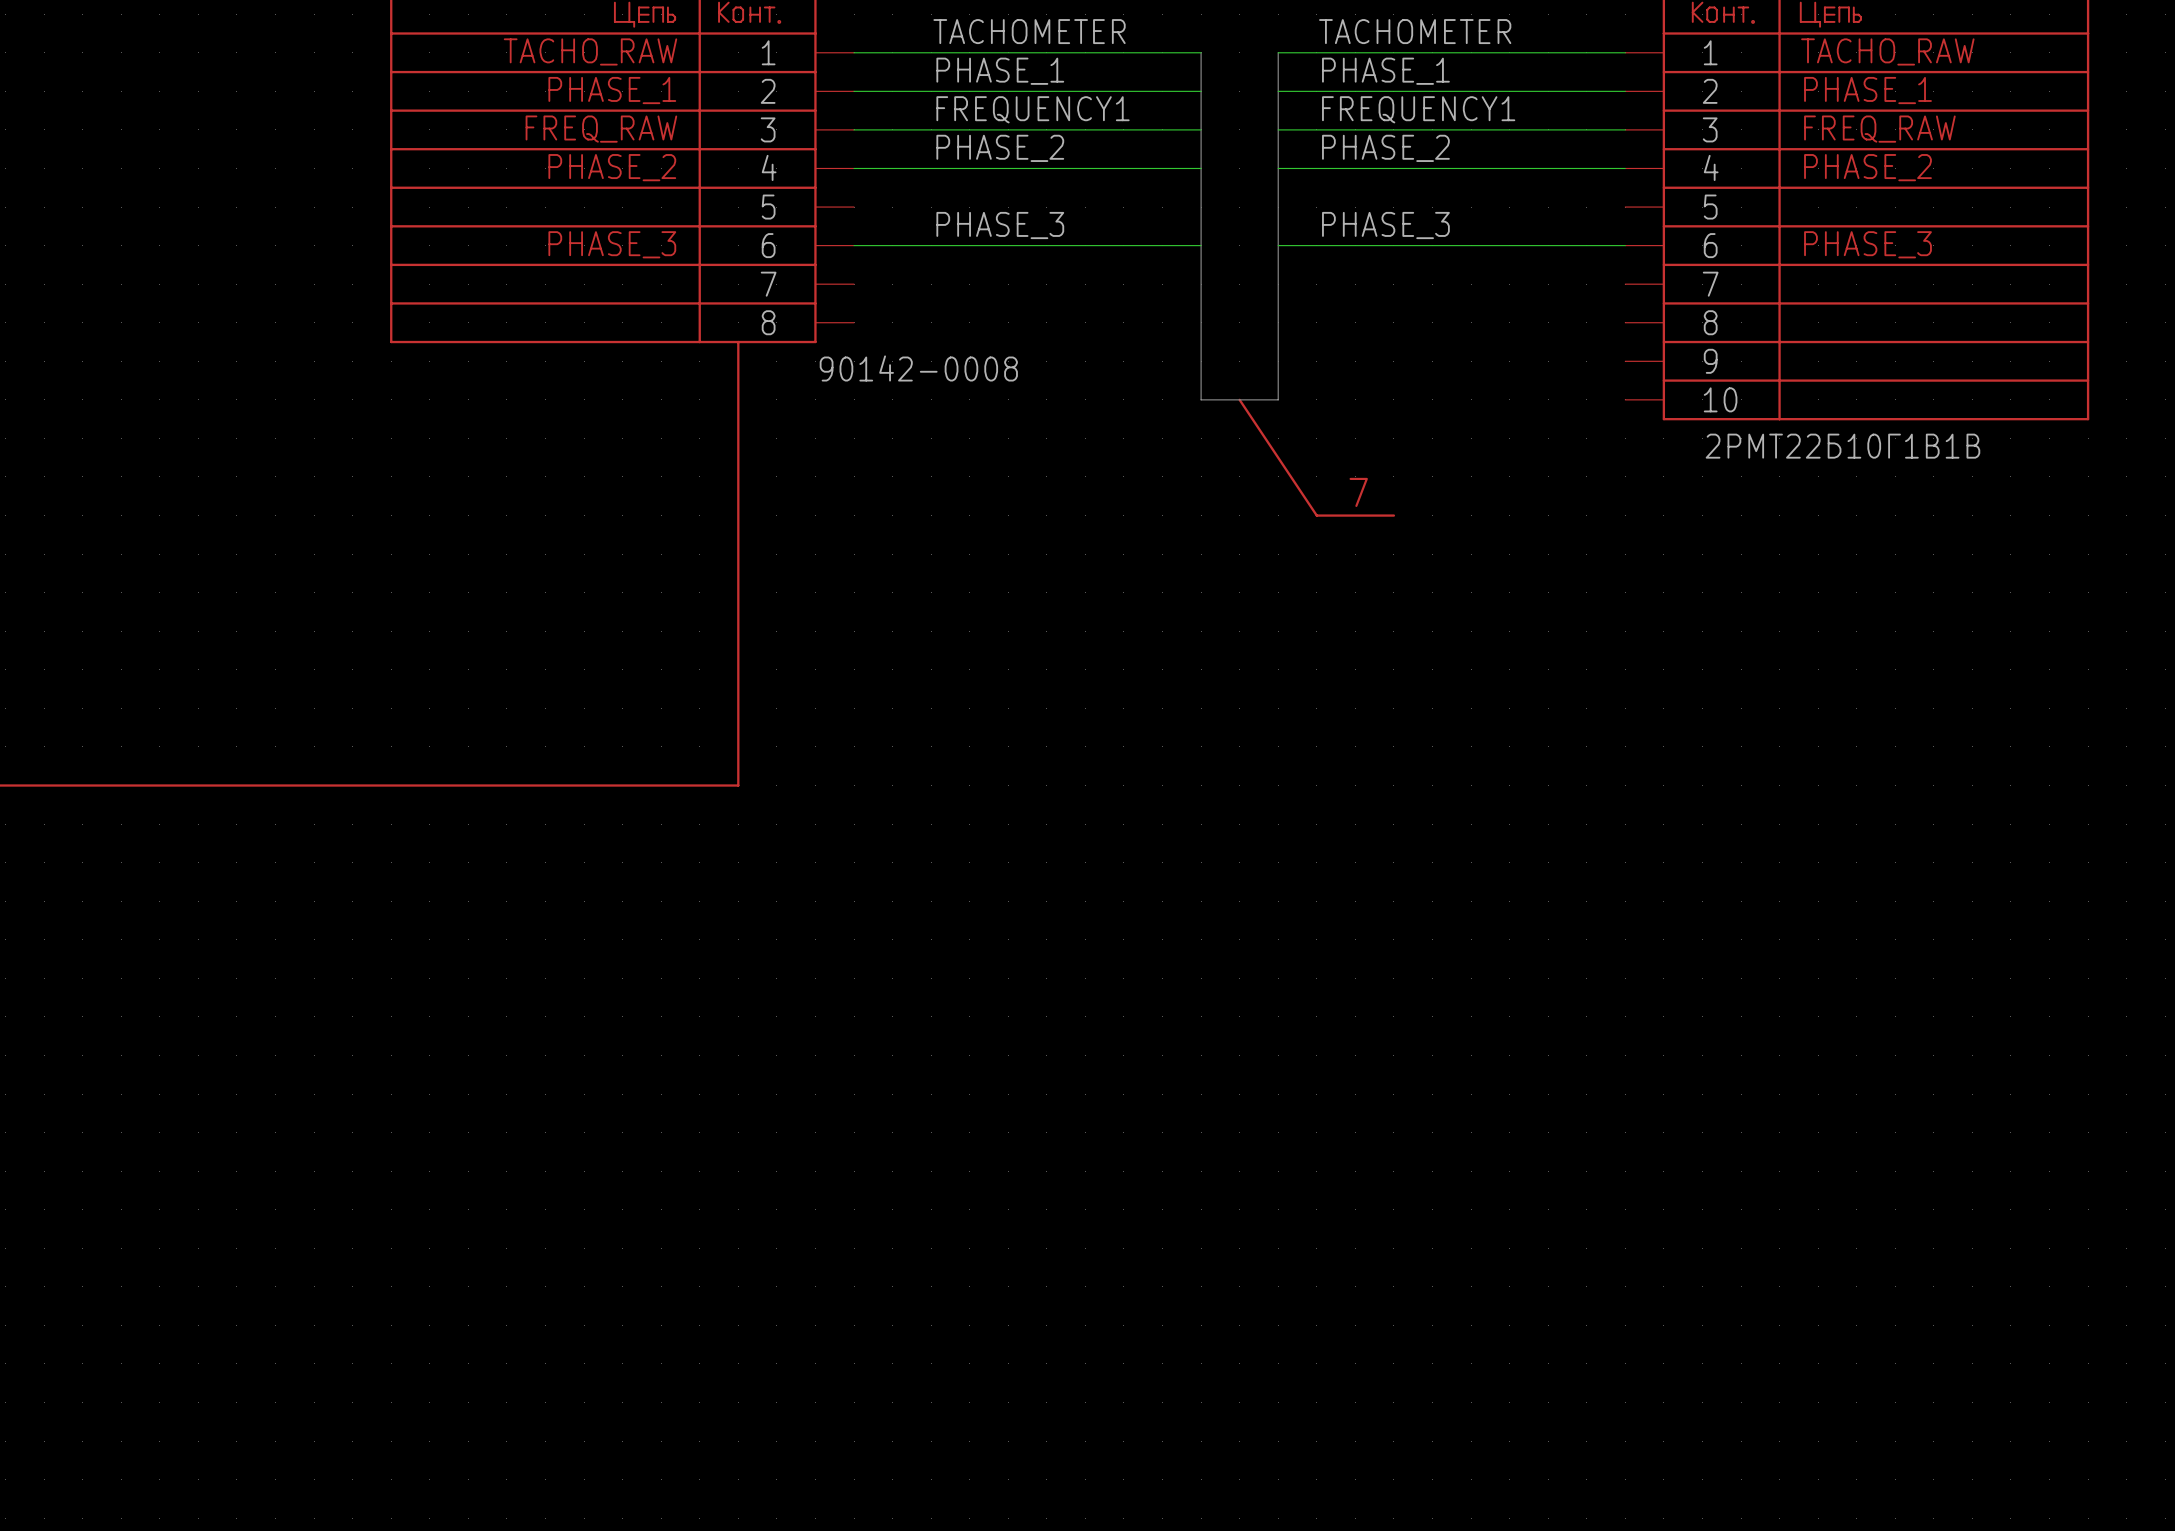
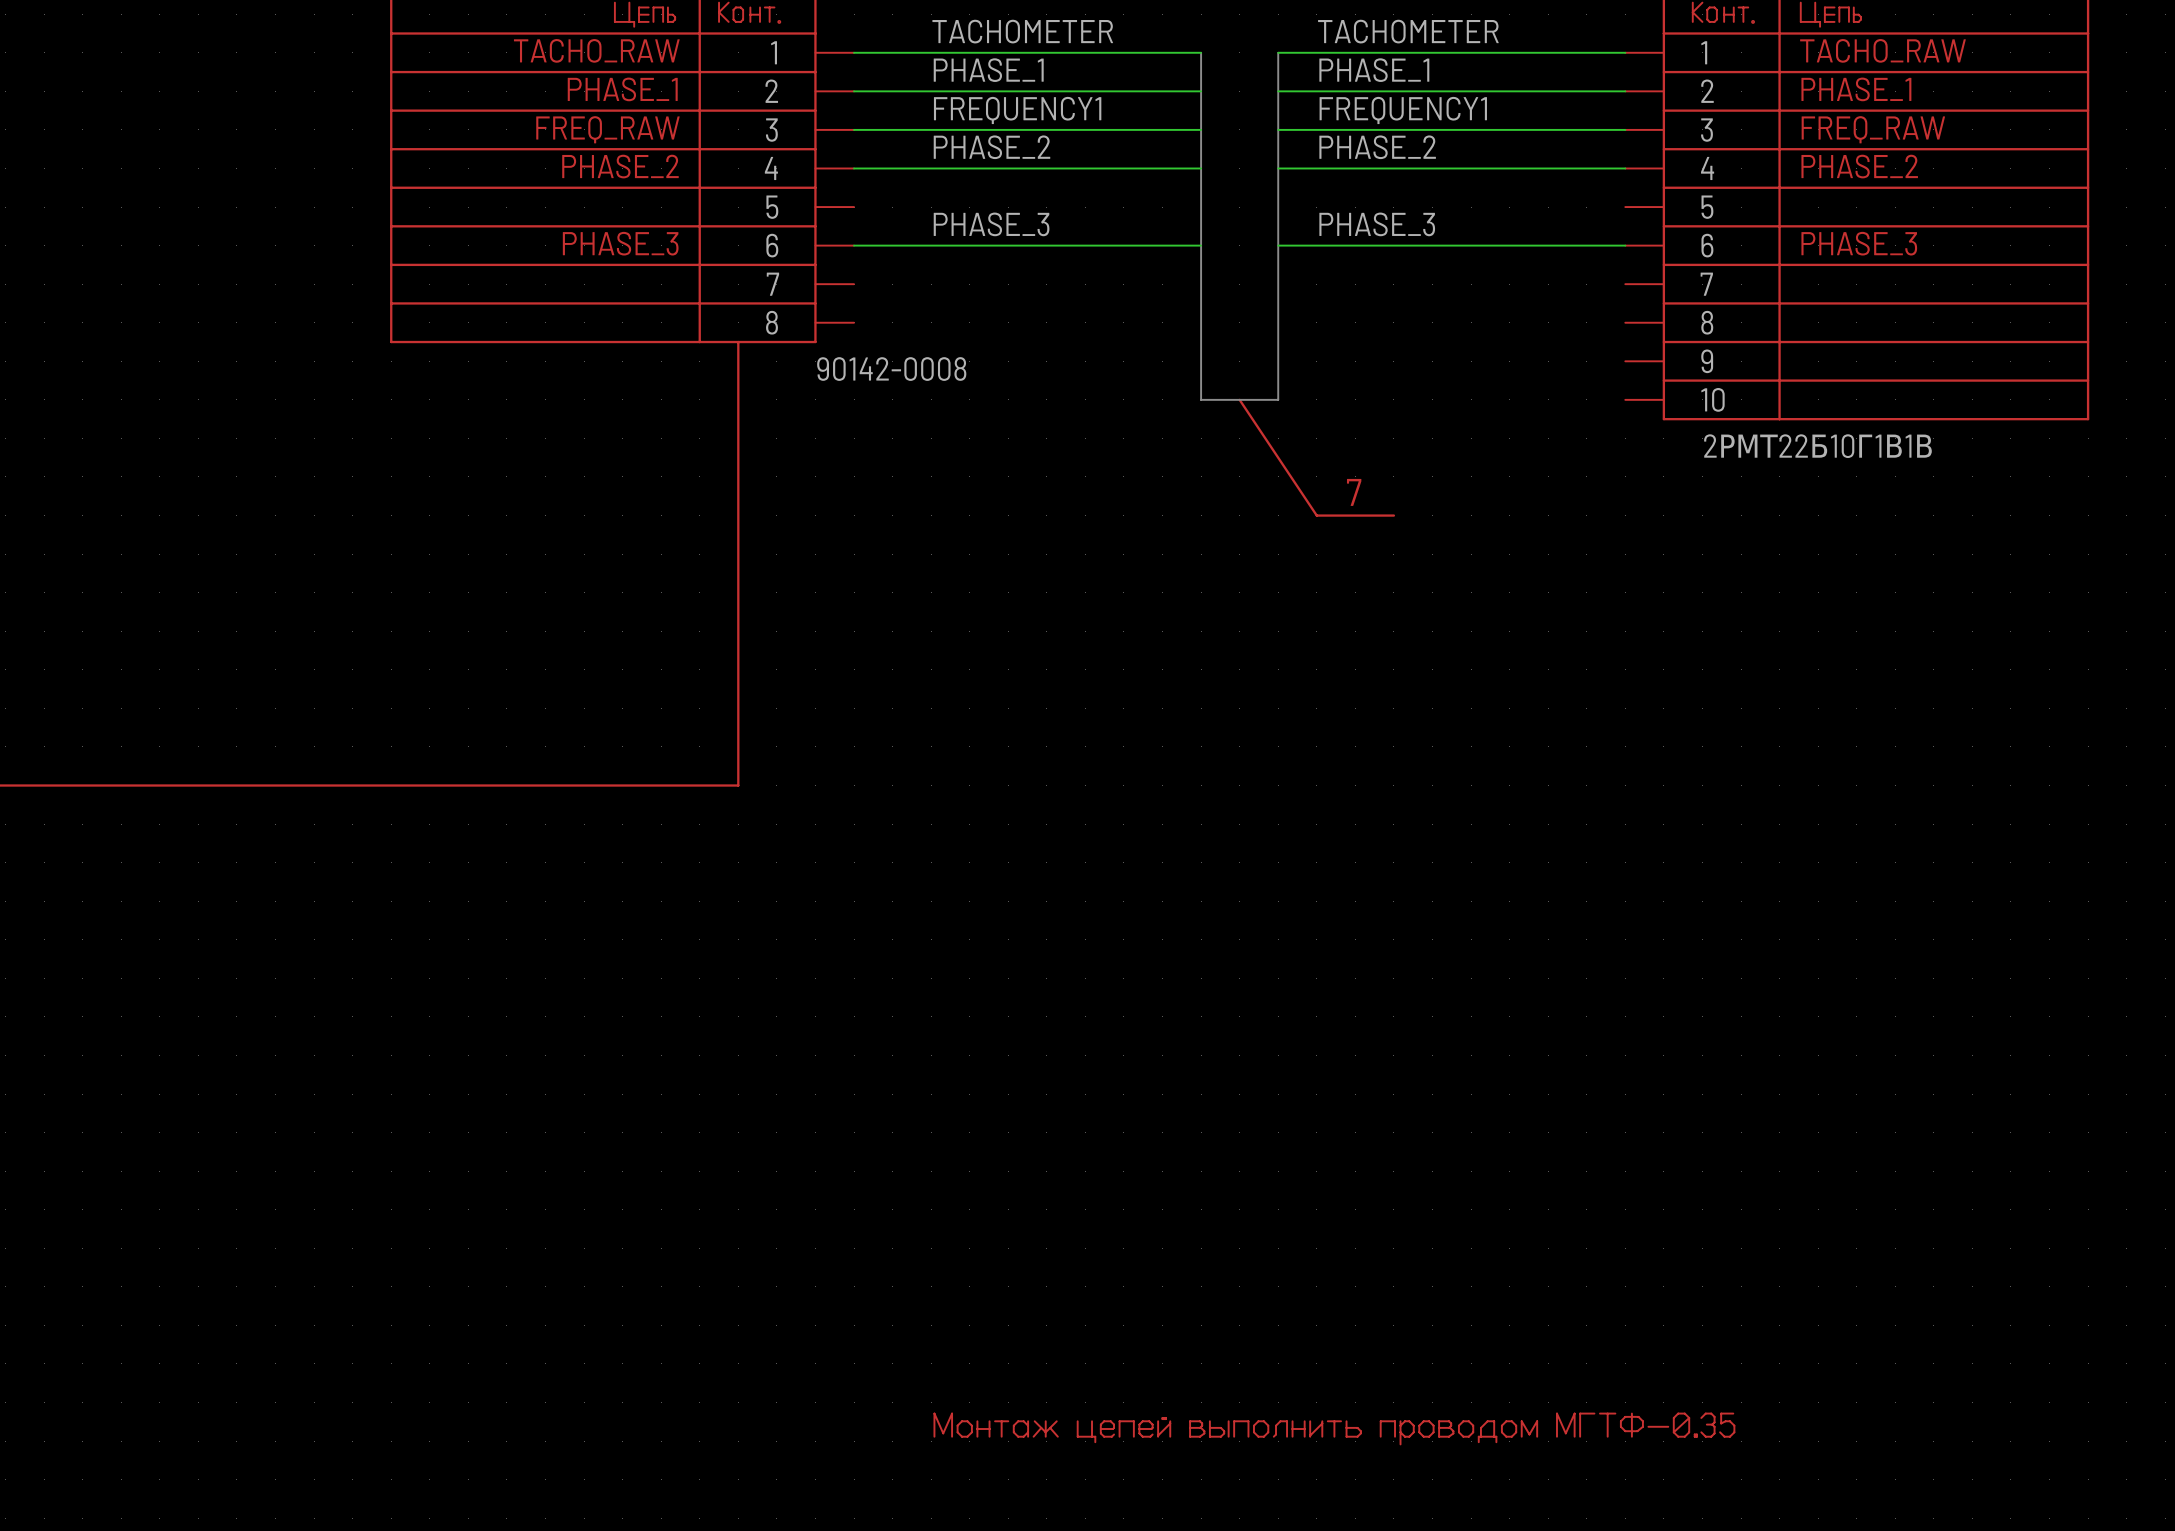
line: none -> (1594, 1413) (1580, 1413) (1580, 1436)
line: none -> (1599, 1413) (1615, 1413)
line: none -> (1607, 1413) (1607, 1436)
line: none -> (1631, 1413) (1631, 1436)
line: none -> (1733, 1413) (1721, 1413) (1721, 1423) (1729, 1421) (1734, 1425) (1734, 1432) (1729, 1436) (1724, 1436) (1720, 1432)
line: none -> (1625, 1416) (1620, 1421) (1620, 1426) (1625, 1431) (1637, 1431) (1642, 1426) (1642, 1421) (1638, 1416) (1625, 1416)
line: none -> (1162, 1417) (1162, 1419) (1165, 1419) (1165, 1417) (1162, 1417)
line: none -> (1689, 1417) (1684, 1413) (1678, 1413) (1673, 1417) (1673, 1432)
line: none -> (1689, 1417) (1689, 1432) (1684, 1436) (1678, 1436) (1673, 1432)
line: none -> (1689, 1417) (1673, 1432)
line: none -> (1701, 1417) (1705, 1413) (1711, 1413) (1714, 1416) (1714, 1422) (1712, 1424)
line: none -> (961, 1421) (967, 1421) (971, 1425) (971, 1432) (967, 1436) (961, 1436) (957, 1432) (957, 1425) (961, 1421)
line: none -> (977, 1421) (977, 1436)
line: none -> (989, 1421) (989, 1436)
line: none -> (995, 1421) (1008, 1421)
line: none -> (1001, 1421) (1001, 1436)
line: none -> (1028, 1421) (1028, 1436)
line: none -> (1034, 1421) (1045, 1432) (1056, 1421)
line: none -> (1045, 1421) (1045, 1436)
line: none -> (1077, 1421) (1077, 1436) (1095, 1436) (1095, 1442)
line: none -> (1092, 1421) (1092, 1436)
line: none -> (1158, 1421) (1158, 1436)
line: none -> (1170, 1421) (1170, 1436)
line: none -> (1209, 1421) (1209, 1436) (1220, 1436) (1224, 1433) (1220, 1427) (1209, 1427)
line: none -> (1228, 1421) (1228, 1436)
line: none -> (1258, 1421) (1263, 1421) (1268, 1425) (1268, 1432) (1263, 1436) (1258, 1436) (1253, 1432) (1253, 1425) (1258, 1421)
line: none -> (1292, 1421) (1292, 1436)
line: none -> (1304, 1421) (1304, 1436)
line: none -> (1310, 1421) (1310, 1436)
line: none -> (1322, 1421) (1322, 1436)
line: none -> (1327, 1421) (1341, 1421)
line: none -> (1334, 1421) (1334, 1436)
line: none -> (1346, 1421) (1346, 1436) (1357, 1436) (1360, 1433) (1357, 1427) (1346, 1427)
line: none -> (1400, 1421) (1400, 1444)
line: none -> (1423, 1421) (1429, 1421) (1433, 1425) (1433, 1432) (1429, 1436) (1423, 1436) (1419, 1432) (1419, 1425) (1423, 1421)
line: none -> (1463, 1421) (1468, 1421) (1473, 1425) (1473, 1432) (1468, 1436) (1463, 1436) (1458, 1432) (1458, 1425) (1463, 1421)
line: none -> (1506, 1421) (1511, 1421) (1516, 1425) (1516, 1432) (1511, 1436) (1506, 1436) (1501, 1432) (1501, 1425) (1506, 1421)
line: none -> (1170, 1423) (1158, 1435)
line: none -> (1322, 1423) (1310, 1435)
line: none -> (1706, 1424) (1712, 1424)
line: none -> (1712, 1424) (1714, 1426) (1714, 1433) (1711, 1436) (1705, 1436) (1701, 1432)
line: none -> (1028, 1425) (1023, 1421) (1018, 1421) (1013, 1425) (1013, 1432) (1018, 1436) (1023, 1436) (1028, 1432)
line: none -> (1400, 1425) (1404, 1421) (1409, 1421) (1413, 1425) (1413, 1432) (1409, 1436) (1404, 1436) (1400, 1432)
line: none -> (1648, 1426) (1668, 1426)
line: none -> (1041, 1427) (1033, 1436)
line: none -> (1050, 1427) (1057, 1436)
line: none -> (1190, 1427) (1201, 1427) (1204, 1433) (1199, 1436) (1190, 1436) (1190, 1421) (1199, 1421) (1202, 1423) (1202, 1425) (1199, 1427)
line: none -> (1439, 1427) (1450, 1427) (1453, 1433) (1449, 1436) (1439, 1436) (1439, 1421) (1449, 1421) (1451, 1423) (1451, 1425) (1449, 1427)
line: none -> (977, 1428) (989, 1428)
line: none -> (1100, 1428) (1112, 1428) (1114, 1424) (1110, 1421) (1104, 1421) (1100, 1424) (1100, 1433) (1104, 1436) (1111, 1436) (1114, 1434)
line: none -> (1139, 1428) (1151, 1428) (1152, 1424) (1149, 1421) (1142, 1421) (1139, 1424) (1139, 1433) (1142, 1436) (1150, 1436) (1152, 1434)
line: none -> (1292, 1428) (1304, 1428)
line: none -> (1694, 1434) (1696, 1434) (1696, 1436) (1694, 1436) (1694, 1434)
line: none -> (934, 1436) (934, 1413) (943, 1433) (952, 1413) (952, 1436)
line: none -> (1119, 1436) (1119, 1421) (1133, 1421) (1133, 1436)
line: none -> (1234, 1436) (1234, 1421) (1248, 1421) (1248, 1436)
line: none -> (1273, 1436) (1276, 1434) (1276, 1425) (1280, 1421) (1287, 1421) (1287, 1436)
line: none -> (1380, 1436) (1380, 1421) (1395, 1421) (1395, 1436)
line: none -> (1480, 1436) (1480, 1427) (1487, 1421) (1494, 1421) (1494, 1436)
line: none -> (1521, 1436) (1521, 1421) (1529, 1434) (1537, 1421) (1537, 1436)
line: none -> (1556, 1436) (1556, 1413) (1565, 1433) (1574, 1413) (1574, 1436)
line: none -> (1478, 1442) (1478, 1436) (1496, 1436) (1496, 1442)

